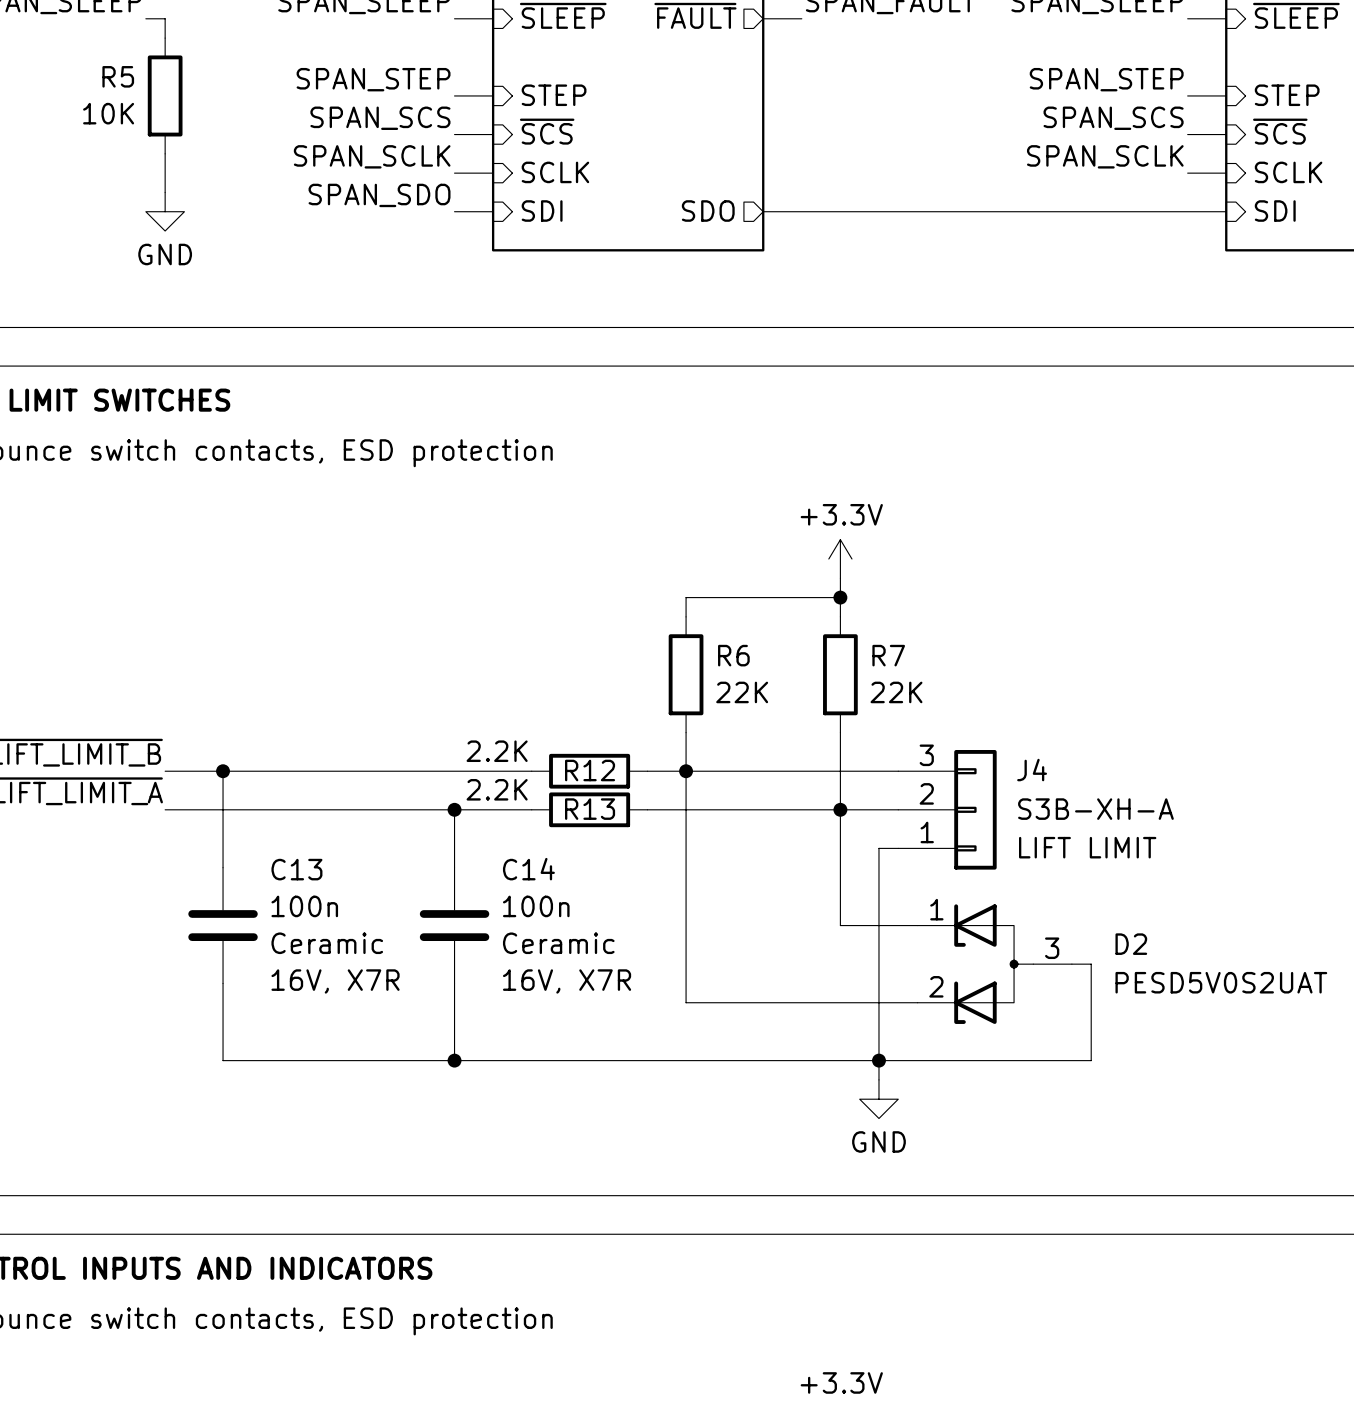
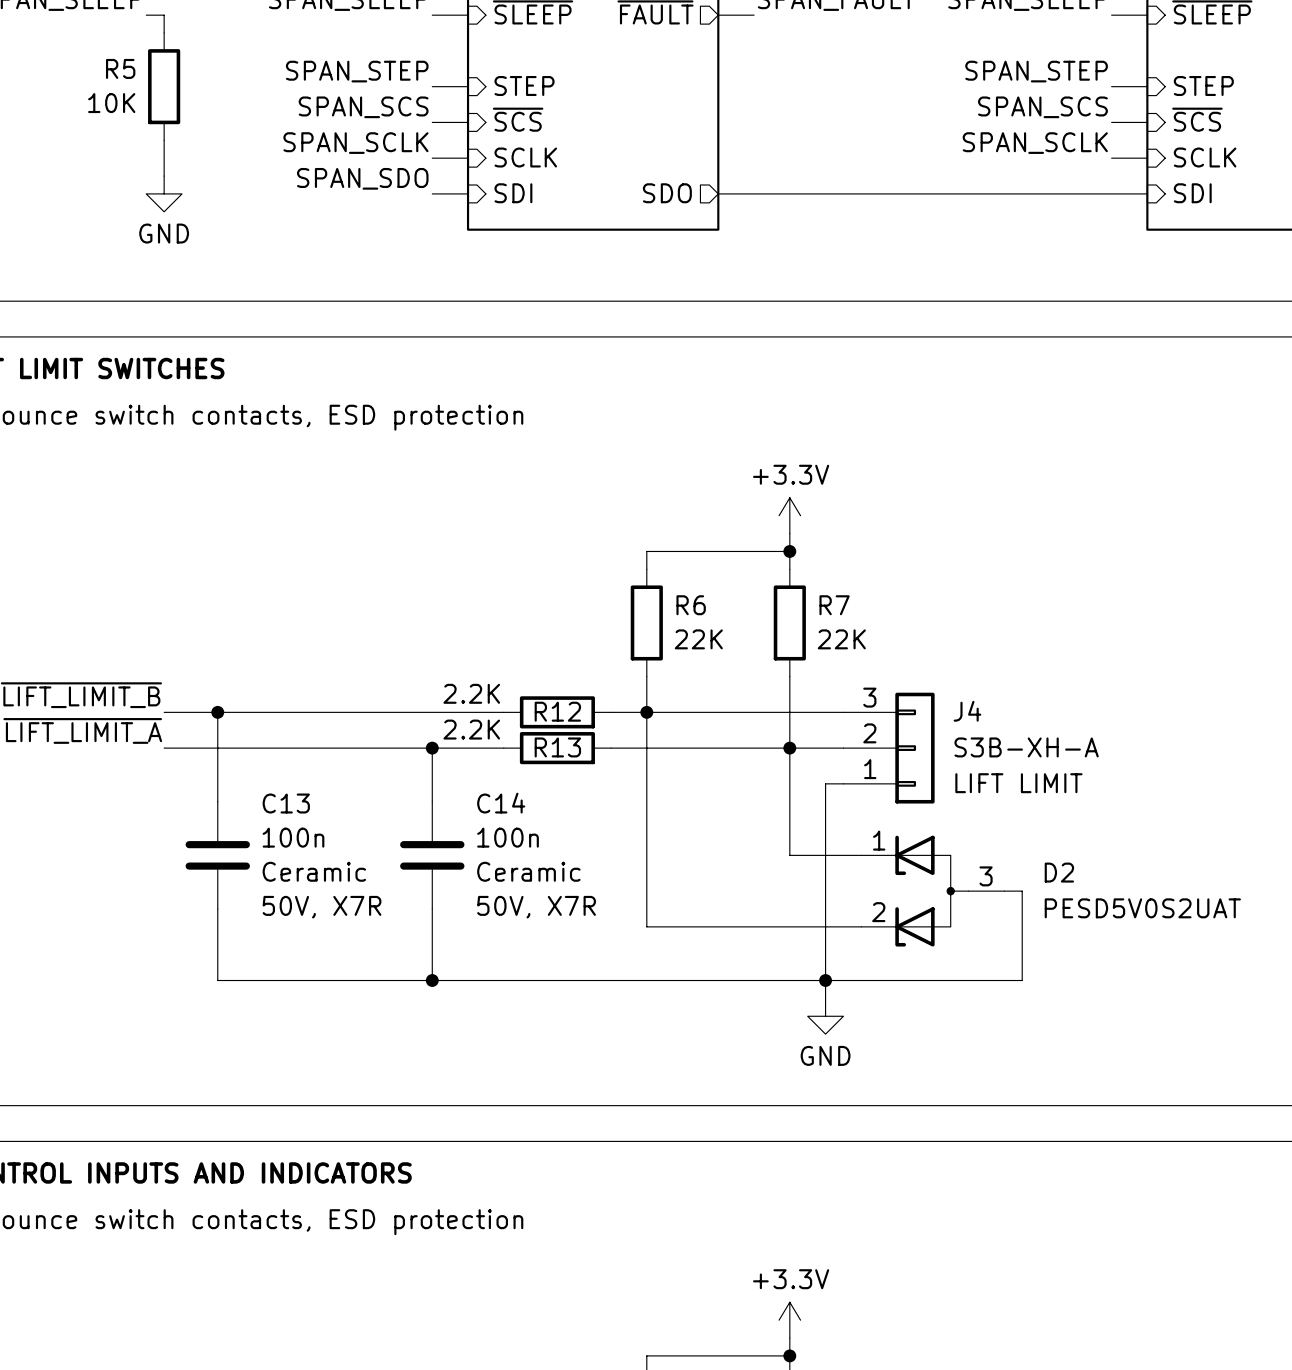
C13 text: 16V, X7R (335, 981) -> 50V, X7R (322, 907)
C14 text: 16V, X7R (567, 981) -> 50V, X7R (536, 907)

